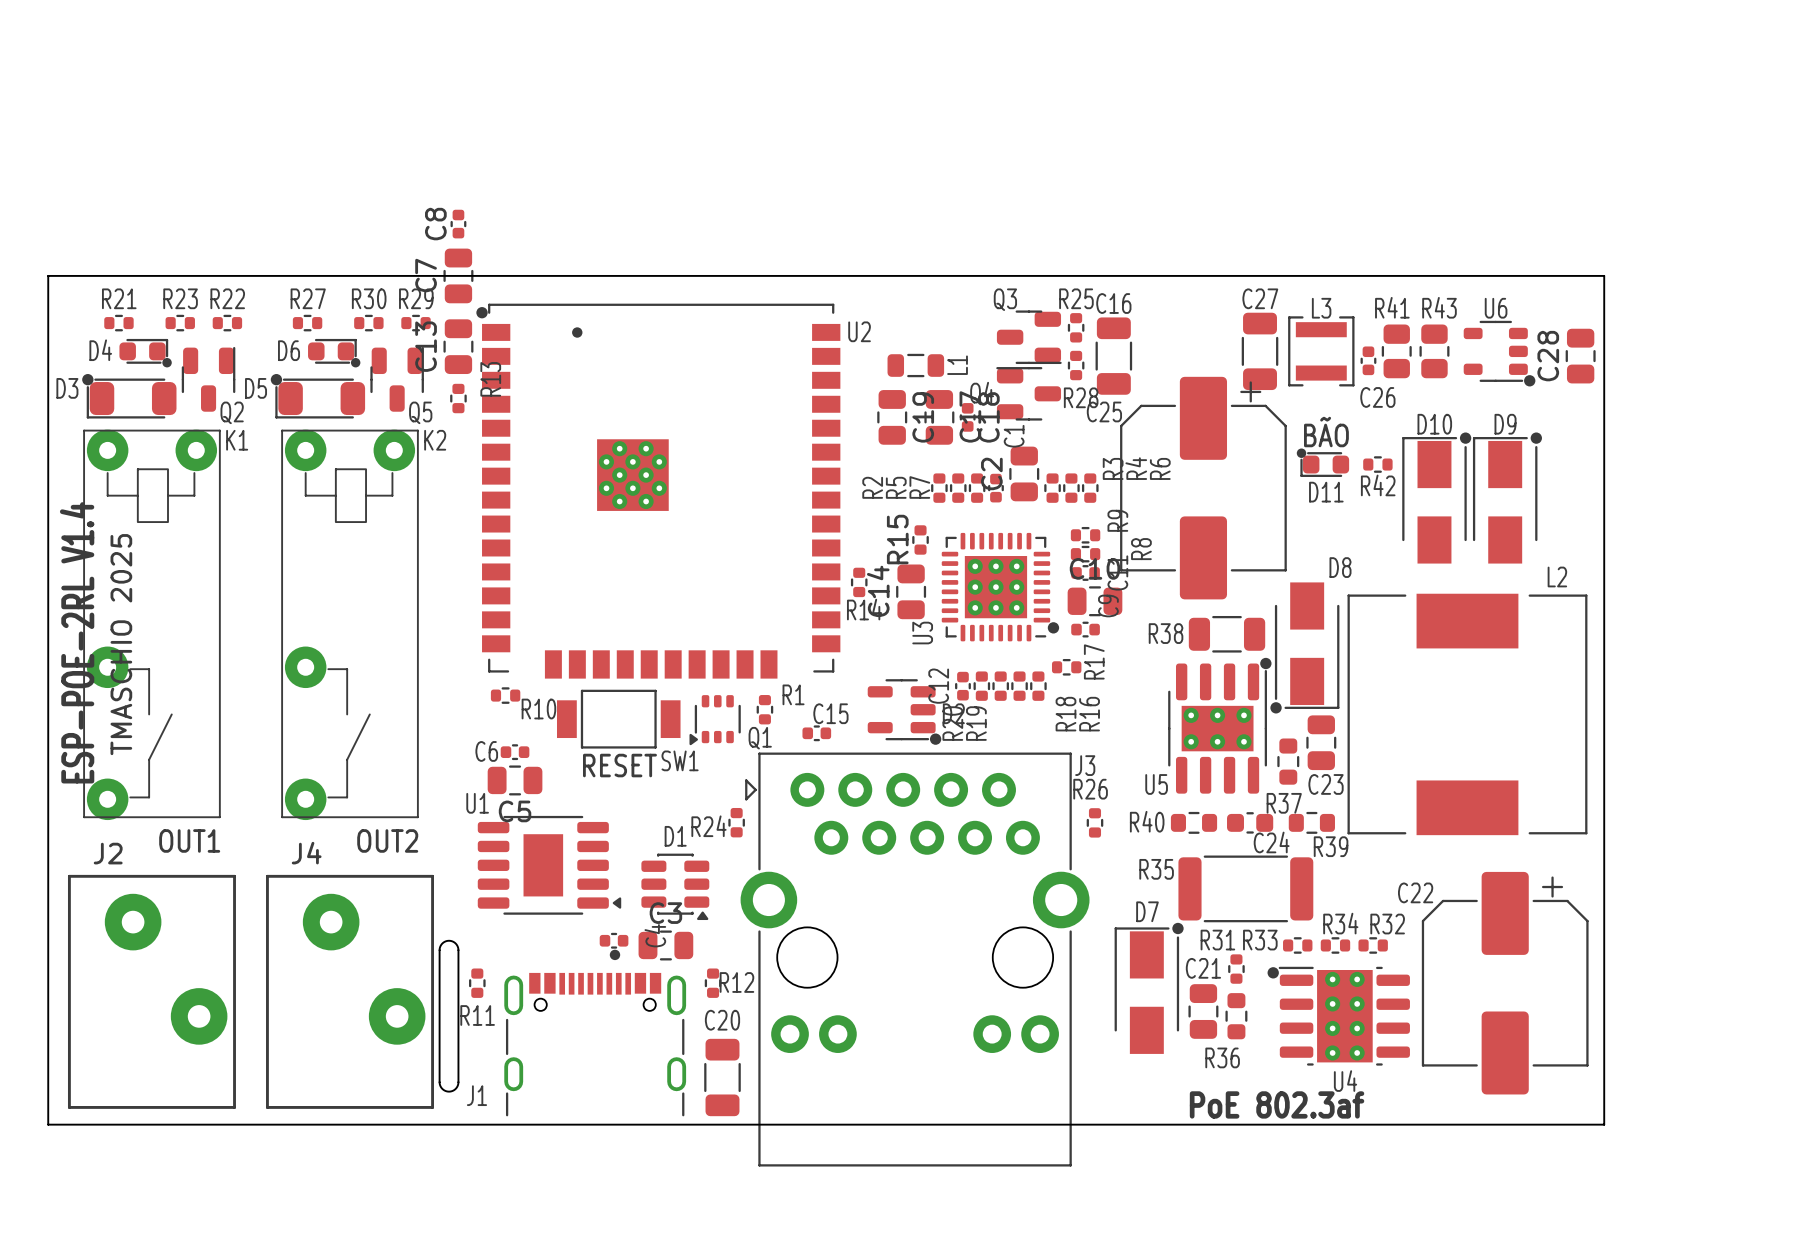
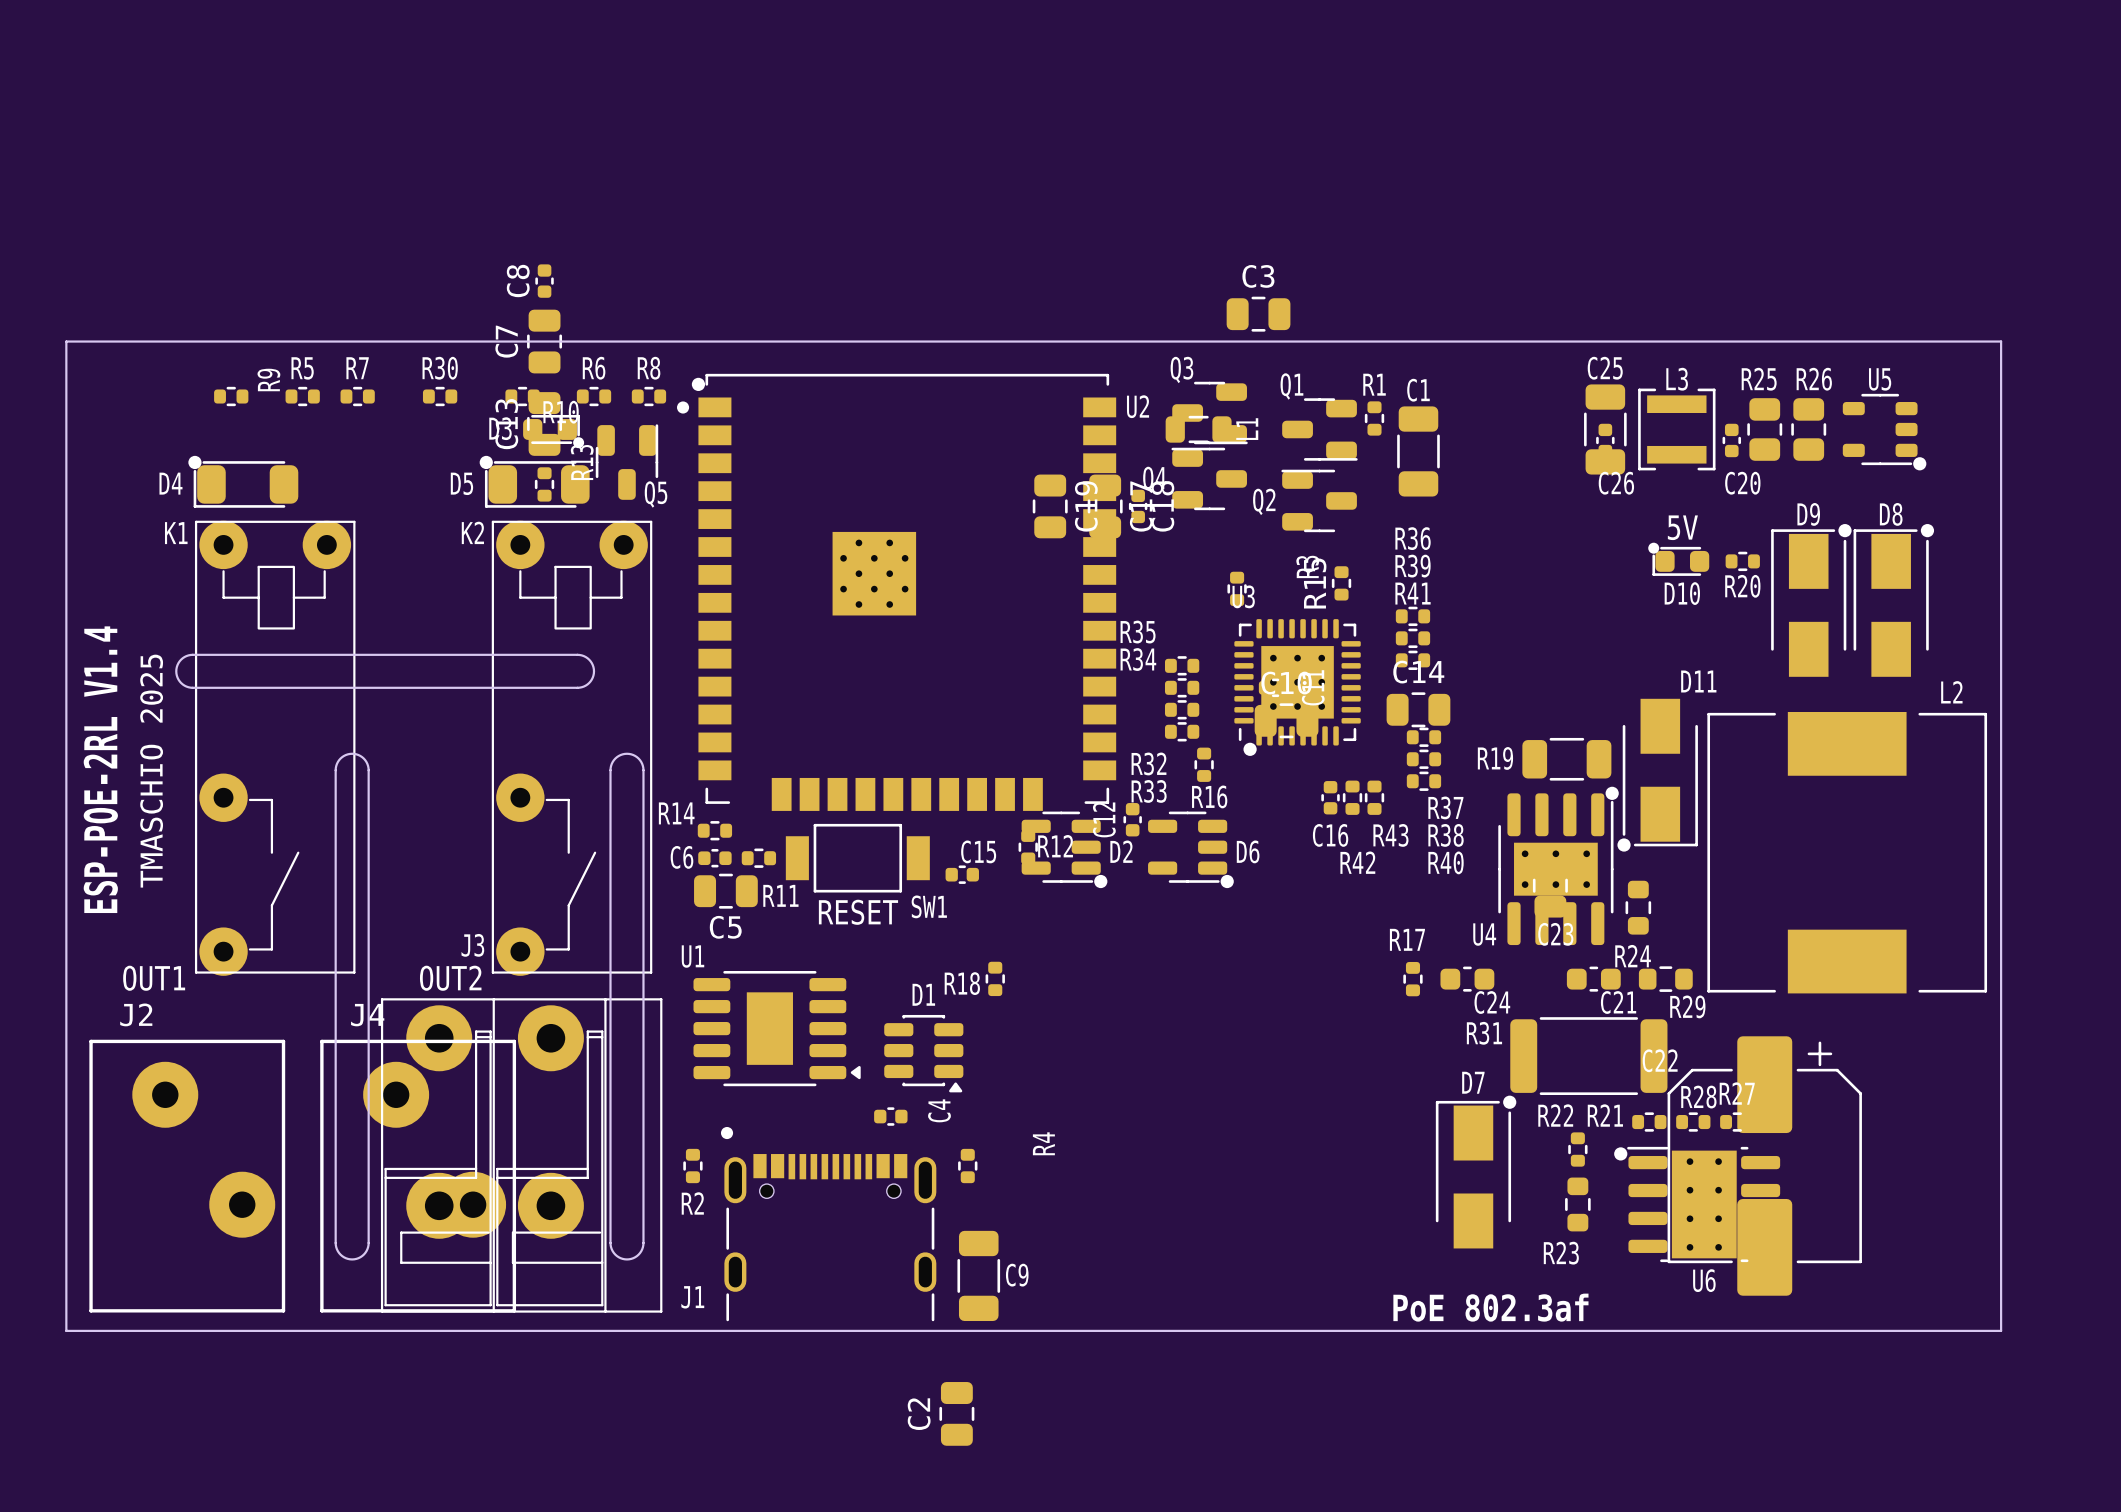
board edge: (1604, 275) (1604, 1124) -> (1880, 341) (2001, 341) (2001, 1330) (1880, 1330)
R21 name position: R21 (119, 298) -> R21 (1605, 1115)
R23 name position: R23 (180, 298) -> R23 (1561, 1253)
R29 name position: R29 (416, 298) -> R29 (1687, 1006)
C16 name position: C16 (1113, 303) -> C16 (1330, 835)
R43 name position: R43 (1439, 307) -> R43 (1390, 835)
U6 name position: U6 (1496, 308) -> U6 (1704, 1280)
R25 footprint: [1067, 313, 1085, 343] -> [1747, 398, 1783, 461]
R23 footprint: [165, 314, 195, 332] -> [1565, 1177, 1591, 1232]
R29 footprint: [401, 314, 431, 332] -> [1638, 966, 1693, 992]
C16 footprint: [1095, 317, 1133, 395] -> [1321, 781, 1340, 815]
U6 footprint: [1463, 320, 1536, 387] -> [1614, 1146, 1781, 1263]
R21 position: (118, 323) -> (1649, 1122)
R22 rotation: 0° (227, 323) -> 90° clockwise (1577, 1149)
R22 position: (227, 323) -> (1577, 1149)
R27 position: (307, 323) -> (1737, 1122)
R41 footprint: [1381, 324, 1412, 379] -> [1395, 650, 1431, 671]
R43 footprint: [1419, 324, 1450, 379] -> [1364, 780, 1385, 815]
D4 footprint: [119, 338, 172, 368] -> [188, 455, 299, 508]
D6 footprint: [308, 338, 361, 368] -> [1148, 811, 1234, 889]
D6 name position: D6 (289, 350) -> D6 (1248, 851)
C27: (1260, 351) -> none
L3 position: (1321, 351) -> (1676, 429)
C28: (1580, 356) -> none
L1 position: (915, 365) -> (1198, 429)
R28 rotation: 0° (1076, 365) -> 90° clockwise (1693, 1122)
R28 position: (1076, 365) -> (1693, 1122)
D3 footprint: [82, 374, 177, 419] -> [523, 414, 585, 449]
C25 footprint: [1120, 376, 1287, 600] -> [1584, 384, 1627, 475]
Q2 rotation: 0° (208, 379) -> 90° counterclockwise (1319, 500)
Q2 position: (208, 379) -> (1319, 500)
Q5 position: (397, 379) -> (626, 462)
D5 name position: D5 (256, 388) -> D5 (461, 483)
D5 position: (317, 396) -> (534, 481)
R28 name position: R28 (1081, 397) -> R28 (1698, 1097)
C25 name position: C25 (1104, 411) -> C25 (1605, 368)
Q2 name position: Q2 (232, 412) -> Q2 (1264, 501)
Q5 name position: Q5 (420, 412) -> Q5 (656, 494)
D10 name position: D10 (1434, 424) -> D10 (1682, 593)
text: BÃO (1326, 432) -> none
D10 footprint: [1402, 432, 1472, 564] -> [1648, 542, 1710, 576]
text: none -> 5V (1682, 527)
K1 name position: K1 (237, 440) -> K1 (176, 533)
K2 name position: K2 (435, 440) -> K2 (472, 532)
D11 footprint: [1296, 448, 1350, 477] -> [1617, 698, 1698, 852]
R42 rotation: 0° (1377, 464) -> 90° clockwise (1352, 797)
R42 position: (1377, 464) -> (1352, 797)
R6 name position: R6 (1160, 468) -> R6 (594, 368)
C1 footprint: [988, 473, 1004, 503] -> [1397, 406, 1440, 497]
C2 position: (1024, 473) -> (956, 1413)
R2 name rotation: 0° (872, 487) -> 90° clockwise (692, 1203)
R2 name position: R2 (872, 487) -> R2 (692, 1203)
R2 position: (939, 488) -> (692, 1166)
R5 rotation: 0° (958, 488) -> 90° clockwise (302, 396)
R5 position: (958, 488) -> (302, 396)
R7 rotation: 0° (977, 488) -> 90° clockwise (357, 396)
R7 position: (977, 488) -> (357, 396)
R4 position: (1071, 488) -> (967, 1166)
R6 rotation: 0° (1090, 488) -> 90° clockwise (594, 396)
R6 position: (1090, 488) -> (594, 396)
U2 position: (658, 491) -> (904, 592)
D11 name position: D11 (1326, 492) -> D11 (1698, 681)
D9 position: (1507, 498) -> (1811, 600)
R9 position: (1085, 535) -> (231, 396)
R15 position: (920, 539) -> (1341, 583)
board edge: none -> (192, 654) (577, 654) (589, 659) (594, 671) (589, 682) (577, 687) (192, 687) (181, 682) (176, 671) (181, 659) (192, 654)
R8 name rotation: 0° (1141, 549) -> 90° clockwise (649, 368)
R8 name position: R8 (1141, 549) -> R8 (649, 368)
R8 position: (1085, 554) -> (648, 396)
D8 name position: D8 (1340, 567) -> D8 (1891, 514)
R14 rotation: 0° (859, 582) -> 90° clockwise (714, 830)
R14 position: (859, 582) -> (714, 830)
U3 rotation: 0° (1000, 587) -> 90° clockwise (1297, 687)
U3 position: (1000, 587) -> (1297, 687)
C14 rotation: 0° (911, 591) -> 90° clockwise (1418, 709)
C14 position: (911, 591) -> (1418, 709)
R38 footprint: [1188, 615, 1266, 653] -> [1406, 749, 1442, 769]
C9 footprint: [1071, 621, 1100, 638] -> [957, 1230, 1001, 1322]
K1 position: (151, 624) -> (275, 748)
K2 position: (350, 624) -> (572, 748)
R38 name position: R38 (1166, 633) -> R38 (1446, 835)
board edge: none -> (335, 770) (335, 1242) (340, 1254) (352, 1259) (363, 1254) (368, 1242) (368, 770) (363, 758) (352, 753) (340, 758) (335, 770)
board edge: none -> (610, 770) (610, 1242) (615, 1254) (626, 1259) (638, 1254) (643, 1242) (643, 770) (638, 758) (626, 753) (615, 758) (610, 770)
D8 rotation: 0° (1304, 647) -> 180° (1893, 600)
D8 position: (1304, 647) -> (1893, 600)
U5 footprint: [1168, 657, 1272, 794] -> [1842, 393, 1927, 471]
R17 name position: R17 (1094, 661) -> R17 (1407, 939)
R17 rotation: 0° (1066, 667) -> 90° clockwise (1412, 979)
R17 position: (1066, 667) -> (1412, 979)
R19 footprint: [992, 671, 1009, 701] -> [1522, 737, 1612, 781]
R20 rotation: 0° (981, 686) -> 90° clockwise (1742, 561)
R20 position: (981, 686) -> (1742, 561)
R18 position: (1019, 686) -> (995, 978)
R16 position: (1038, 686) -> (1204, 764)
R1 name position: R1 (793, 694) -> R1 (1374, 384)
R10 position: (505, 695) -> (522, 396)
Q1 footprint: [689, 695, 741, 746] -> [1282, 398, 1358, 461]
R1 position: (764, 709) -> (1374, 418)
R18 name rotation: 0° (1065, 714) -> 90° clockwise (962, 983)
R18 name position: R18 (1065, 714) -> R18 (962, 983)
R16 name rotation: 0° (1089, 714) -> 90° clockwise (1209, 796)
R16 name position: R16 (1089, 714) -> R16 (1209, 796)
L2 position: (1467, 714) -> (1847, 852)
SW1 position: (618, 719) -> (857, 858)
R19 name position: R19 (976, 723) -> R19 (1495, 758)
Q1 name position: Q1 (760, 738) -> Q1 (1291, 386)
R37 footprint: [1277, 738, 1300, 785] -> [1406, 727, 1442, 747]
C6 position: (515, 752) -> (714, 858)
J3 footprint: [740, 752, 1090, 1167] -> [380, 998, 663, 1313]
text position: RESET (619, 765) -> RESET (858, 912)
J3 name position: J3 (1085, 765) -> J3 (472, 945)
C5 position: (515, 780) -> (725, 891)
U5 name position: U5 (1156, 784) -> U5 (1880, 379)
R24 footprint: [728, 807, 745, 838] -> [1625, 880, 1652, 935]
R26 footprint: [1086, 808, 1104, 838] -> [1791, 398, 1827, 461]
R40 footprint: [1170, 811, 1218, 834] -> [1406, 771, 1442, 791]
R39 footprint: [1288, 811, 1335, 834] -> [1395, 628, 1431, 649]
R40 name position: R40 (1147, 821) -> R40 (1446, 862)
R24 name position: R24 (708, 826) -> R24 (1633, 956)
text position: OUT1 (189, 840) -> OUT1 (154, 978)
text position: OUT2 (387, 840) -> OUT2 (450, 978)
R39 name position: R39 (1331, 846) -> R39 (1413, 566)
R35 footprint: [1178, 855, 1314, 923] -> [1164, 656, 1200, 676]
U1 position: (549, 865) -> (777, 1028)
R35 name position: R35 (1156, 869) -> R35 (1138, 632)
D1 position: (675, 886) -> (923, 1053)
R34 name position: R34 (1340, 923) -> R34 (1138, 659)
R32 name position: R32 (1387, 924) -> R32 (1148, 763)
C4 position: (614, 940) -> (890, 1116)
R31 name position: R31 (1217, 940) -> R31 (1484, 1033)
R33 name position: R33 (1260, 940) -> R33 (1149, 791)
C3 position: (665, 945) -> (1258, 314)
R33 position: (1297, 945) -> (1182, 731)
R34 position: (1335, 945) -> (1182, 687)
R32 position: (1373, 945) -> (1182, 709)
board edge: (439, 950) (439, 1083) (443, 1089) (450, 1091) (456, 1087) (458, 1082) (458, 948) (454, 942) (447, 940) (441, 944) (439, 950) -> none
R31 footprint: [1228, 954, 1245, 984] -> [1510, 1017, 1668, 1095]
U4 footprint: [1267, 966, 1410, 1066] -> [1498, 786, 1619, 946]
C21 name position: C21 (1203, 968) -> C21 (1618, 1002)
R11 rotation: 0° (477, 983) -> 90° clockwise (758, 858)
R11 position: (477, 983) -> (758, 858)
R12 position: (713, 983) -> (1028, 847)
C21 footprint: [1188, 984, 1219, 1039] -> [1566, 966, 1621, 992]
D7 position: (1149, 988) -> (1476, 1172)
R36 footprint: [1225, 993, 1248, 1040] -> [1395, 606, 1431, 627]
C20 name position: C20 (722, 1020) -> C20 (1742, 483)
C20 footprint: [704, 1038, 741, 1117] -> [1722, 423, 1742, 458]
J1 position: (595, 1044) -> (830, 1237)
R36 name position: R36 (1222, 1057) -> R36 (1413, 538)
U4 name position: U4 (1345, 1081) -> U4 (1484, 934)

